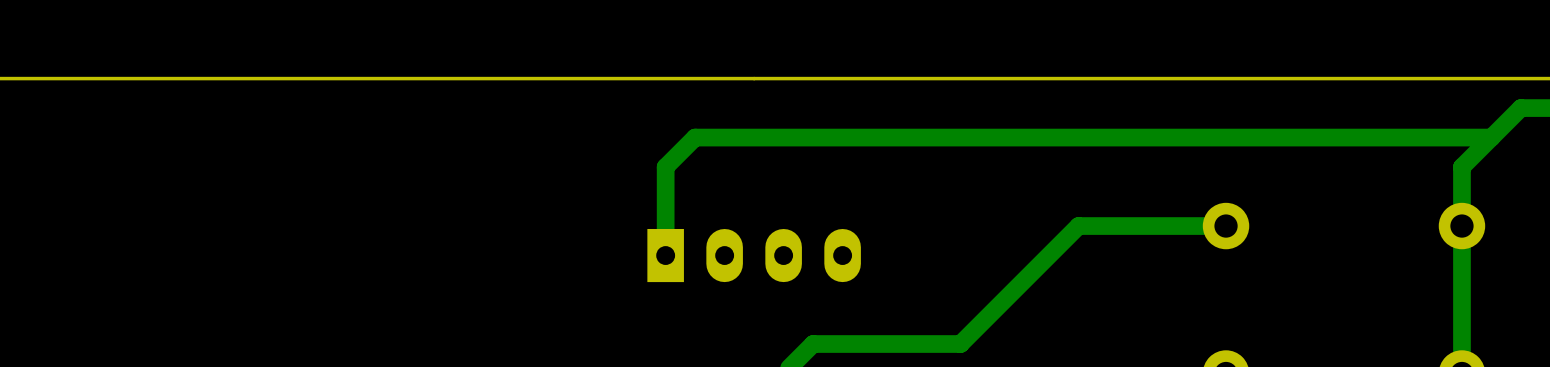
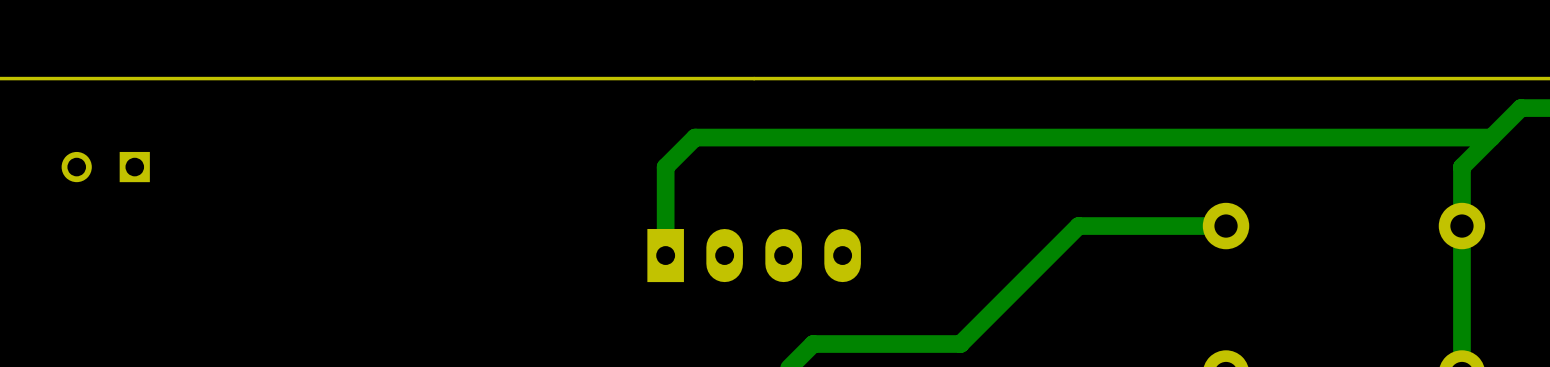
part: none -> (105, 167)

